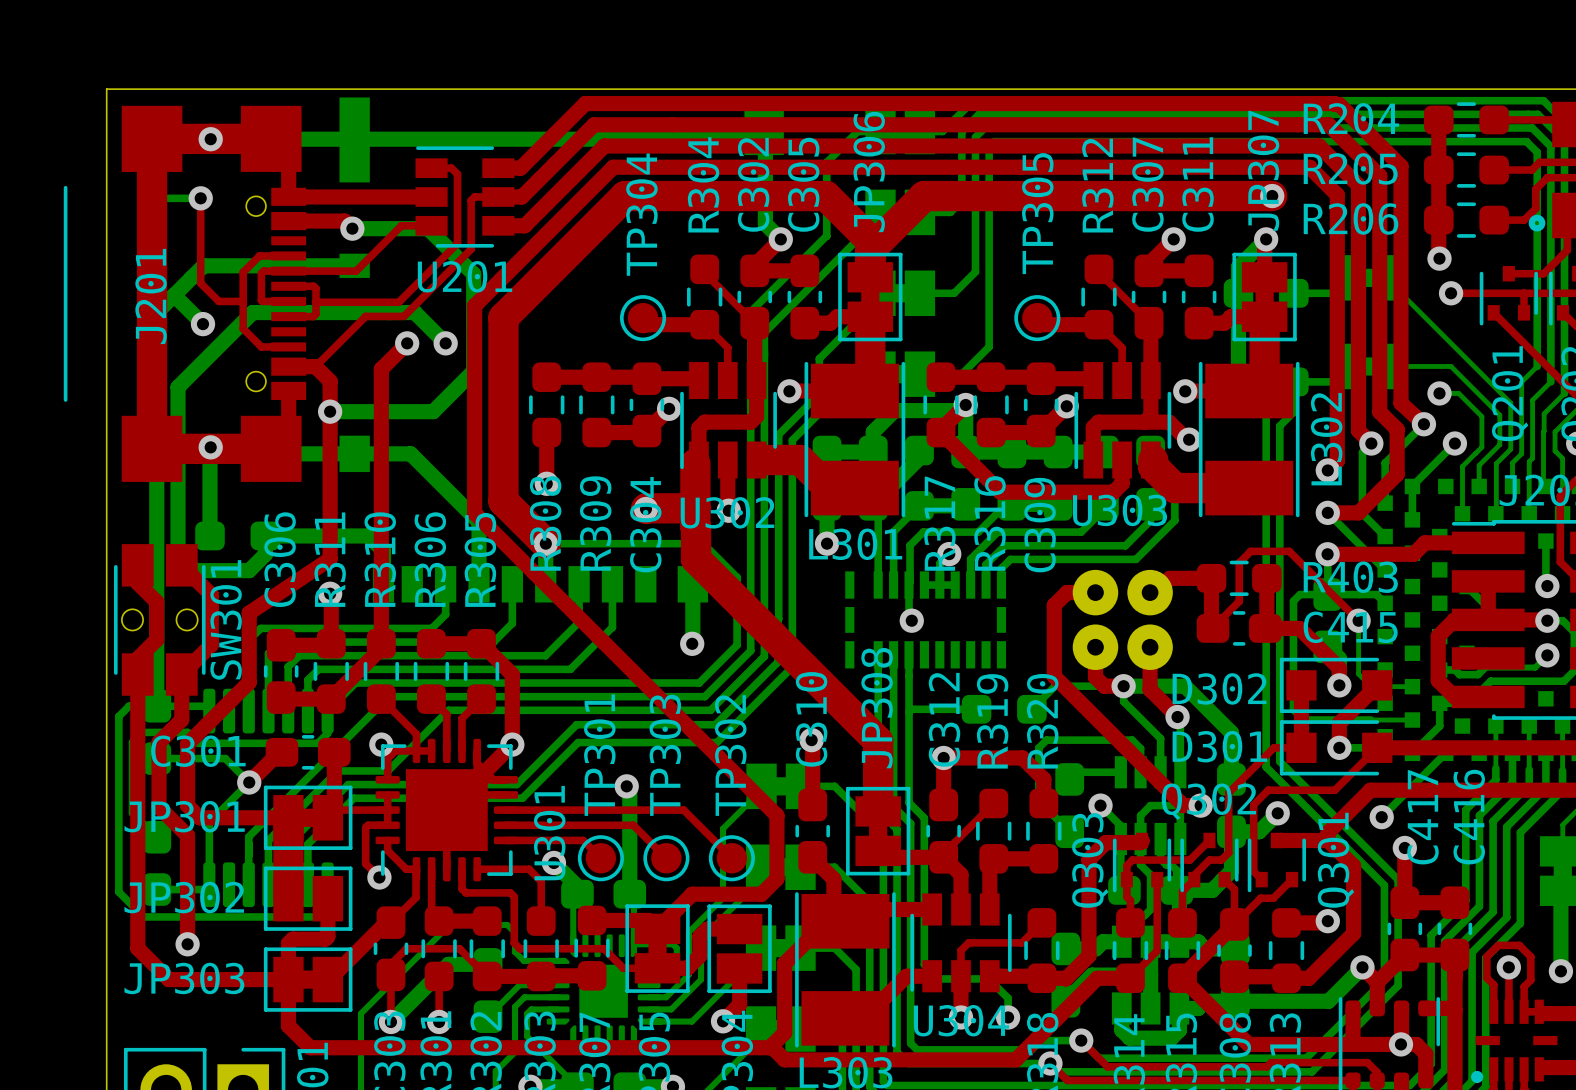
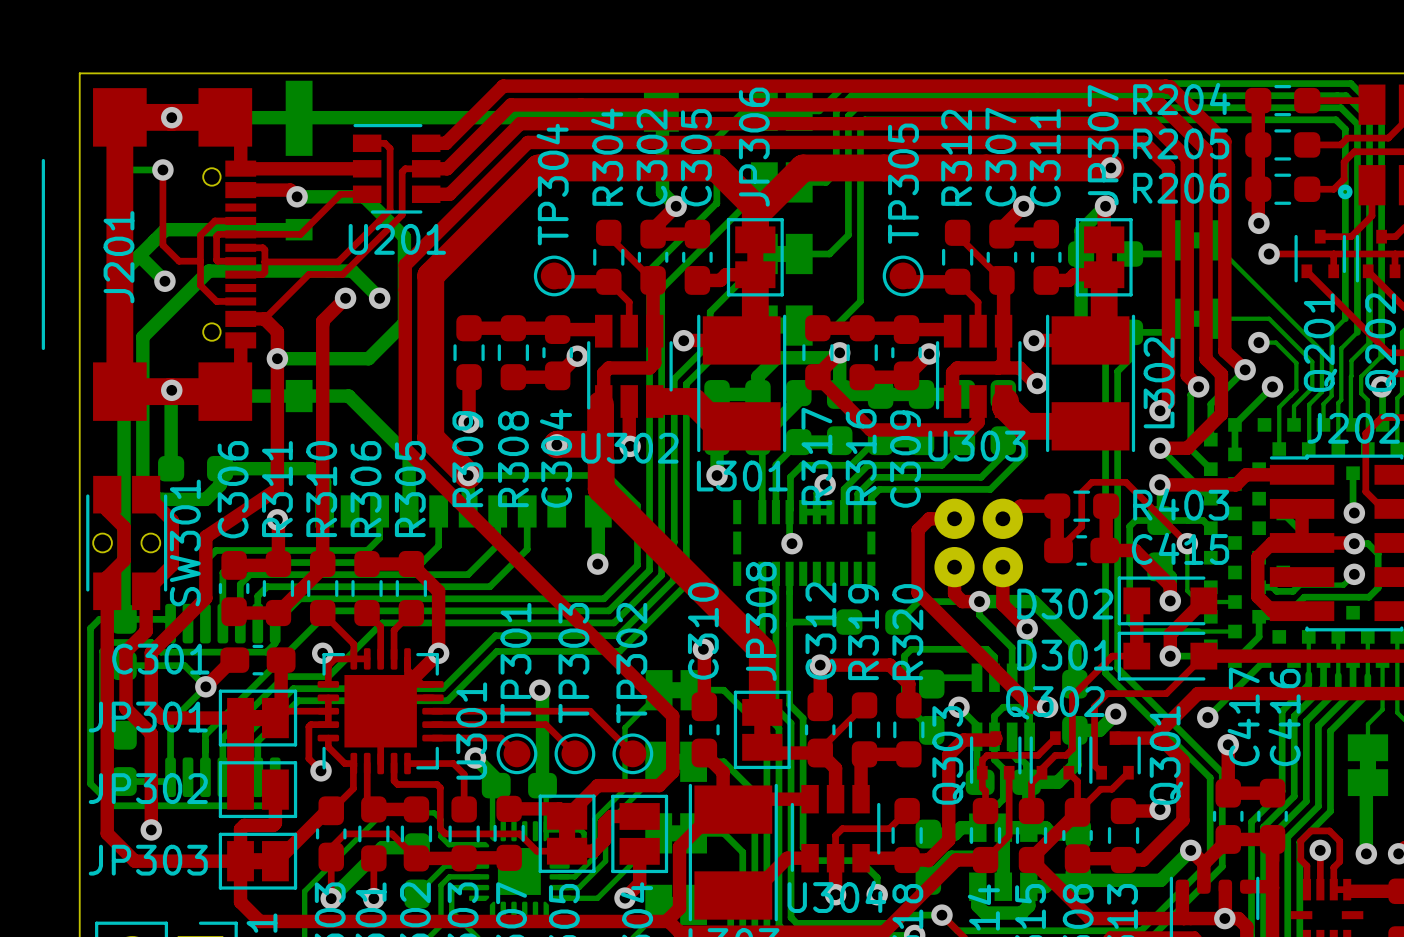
R308 name position: R308 (545, 523) -> R308 (513, 459)
R309 name position: R309 (595, 523) -> R309 (467, 459)

